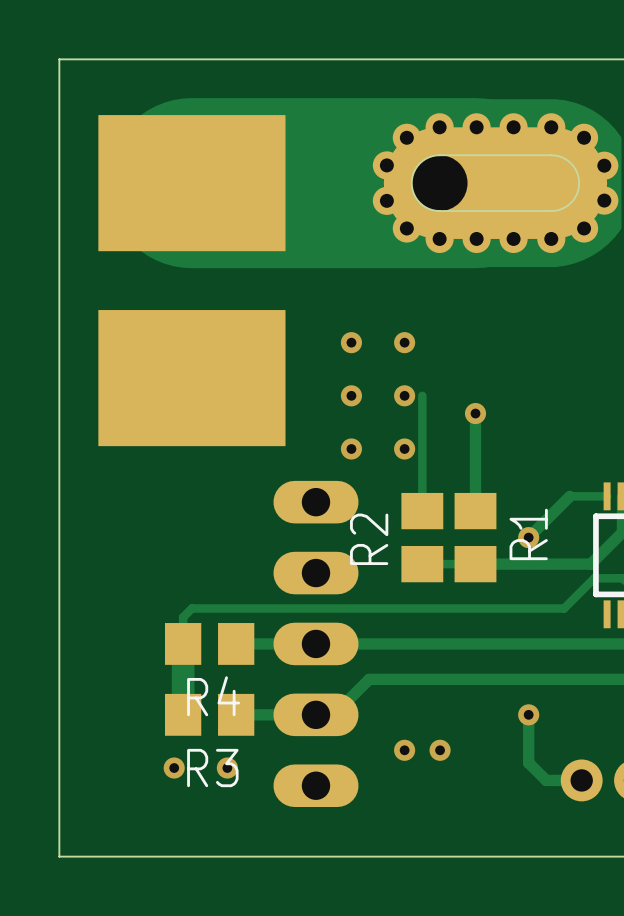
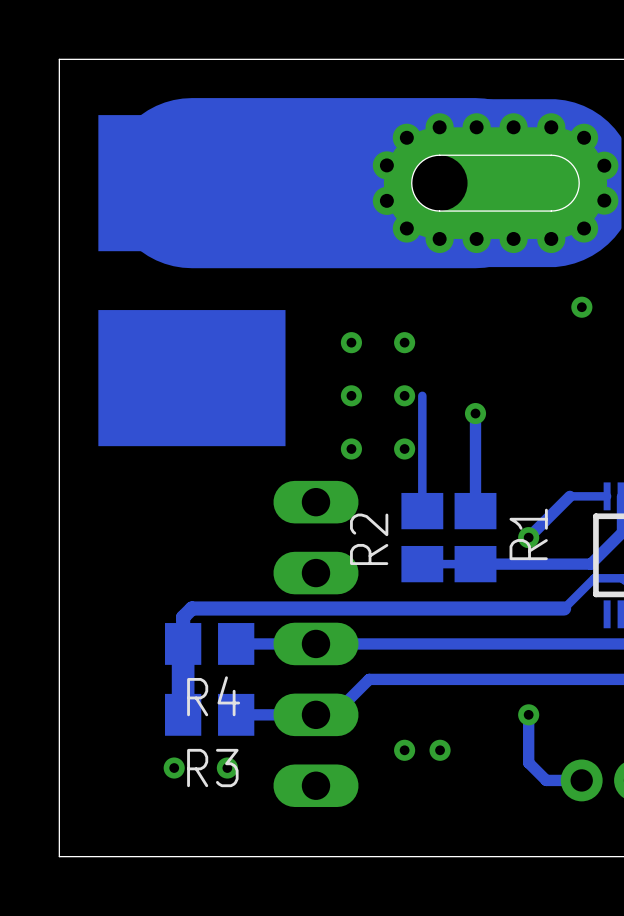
via: none -> (581, 307)
track width: thin (564, 608) (191, 608) (183, 617) (183, 643) -> thick (564, 608) (191, 608) (183, 617) (183, 643)

